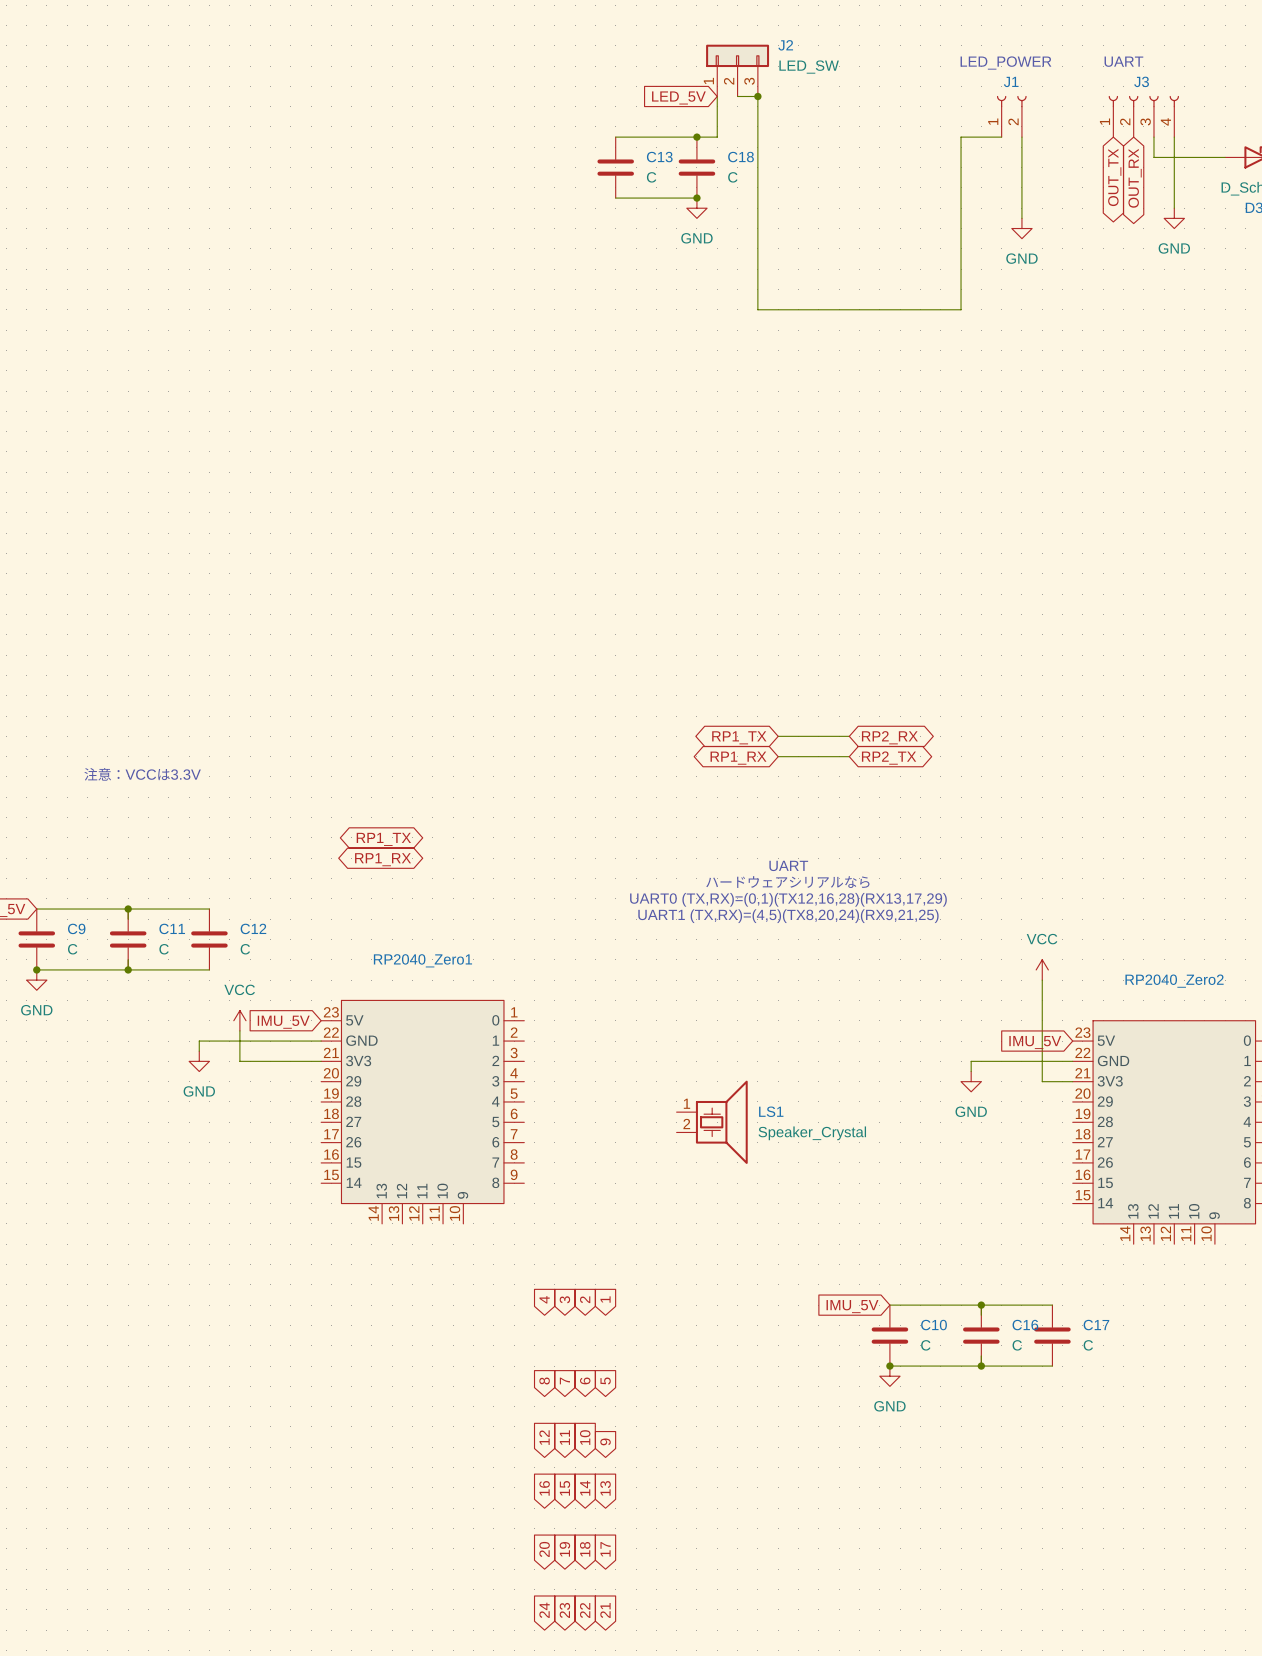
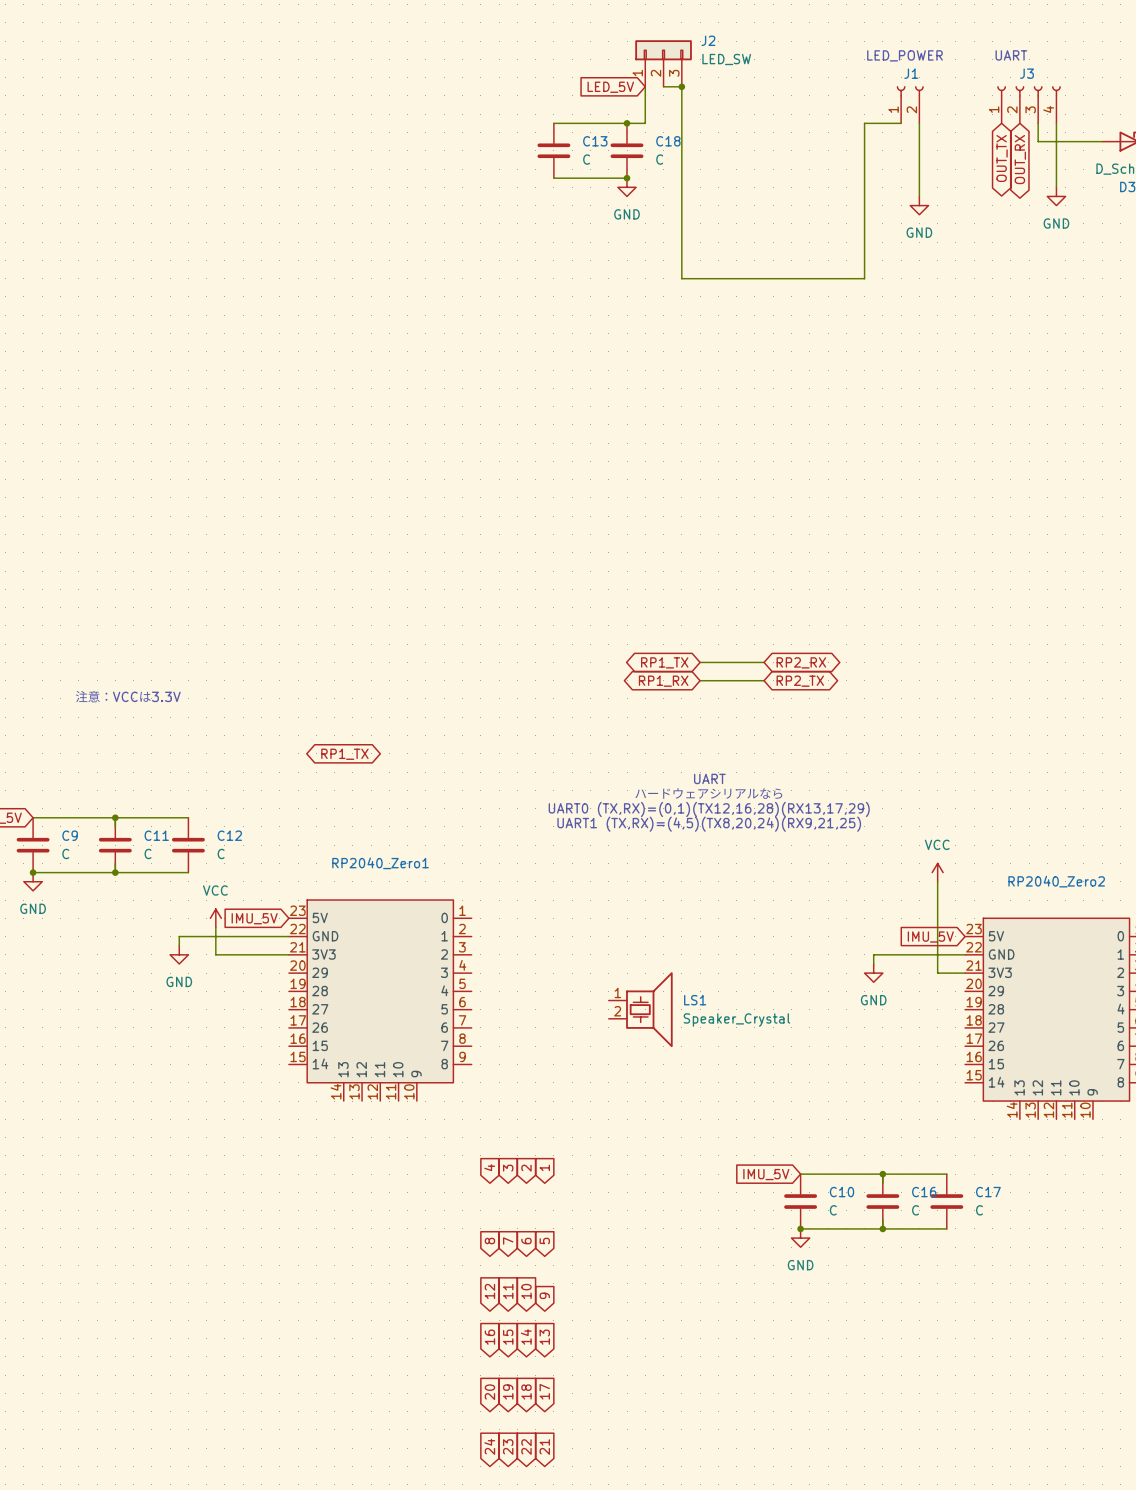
global label: RP1_RX (383, 859) -> none

